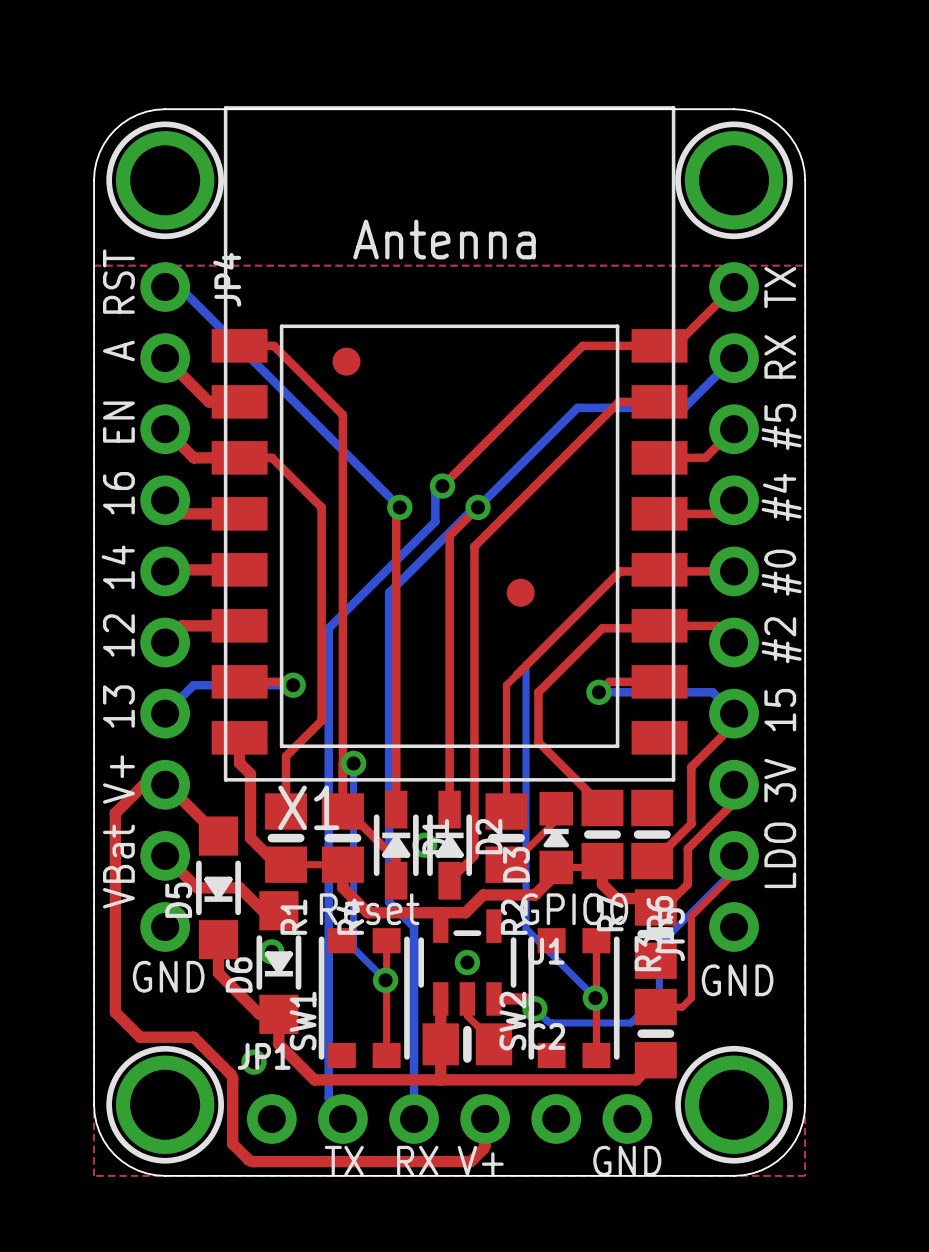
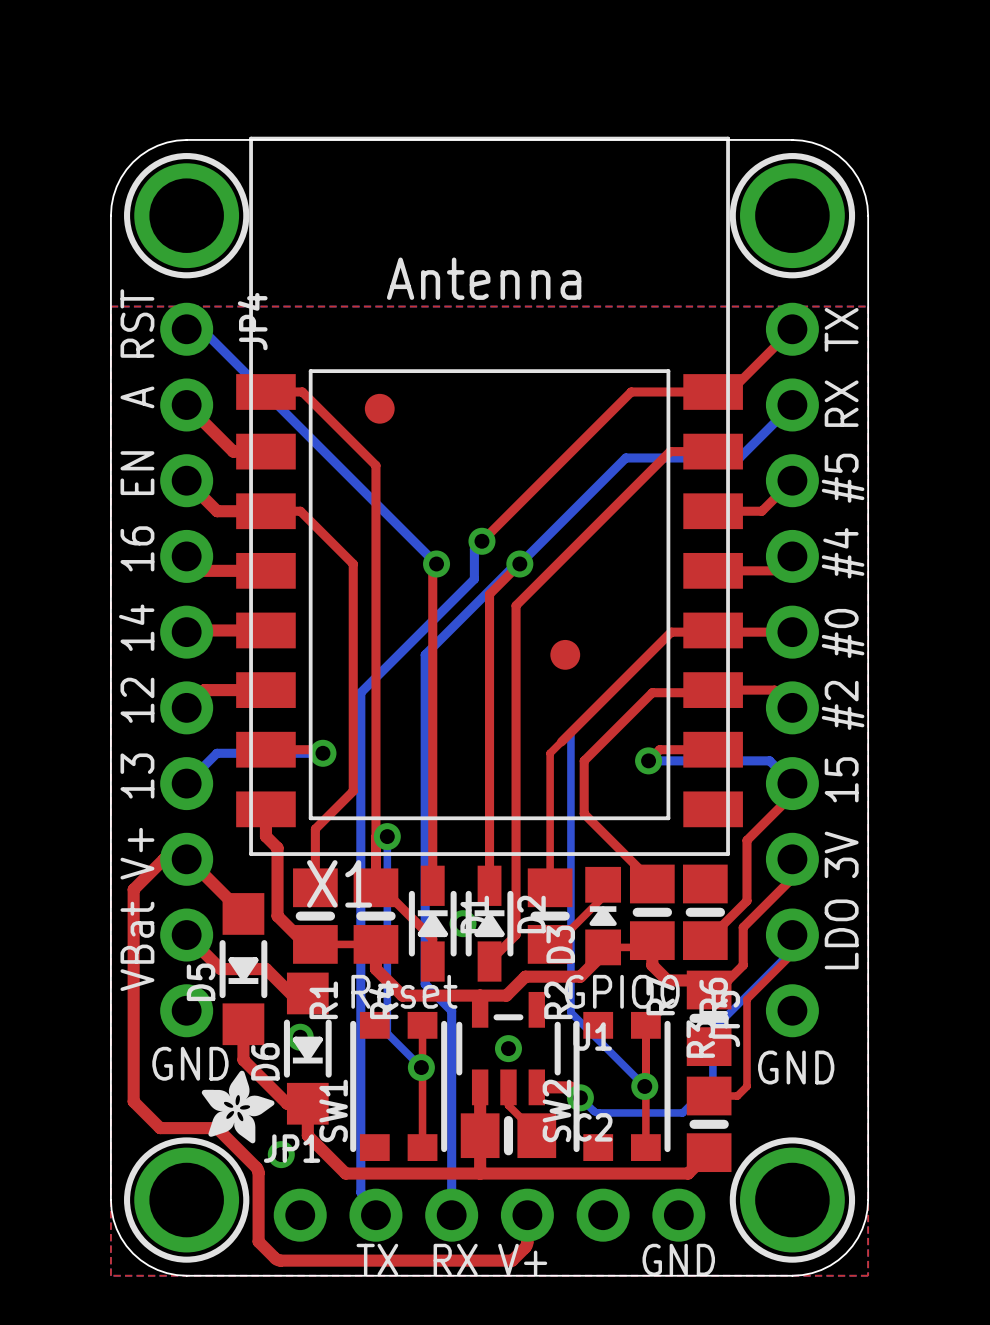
drawing: none -> [201, 1070, 275, 1144]

